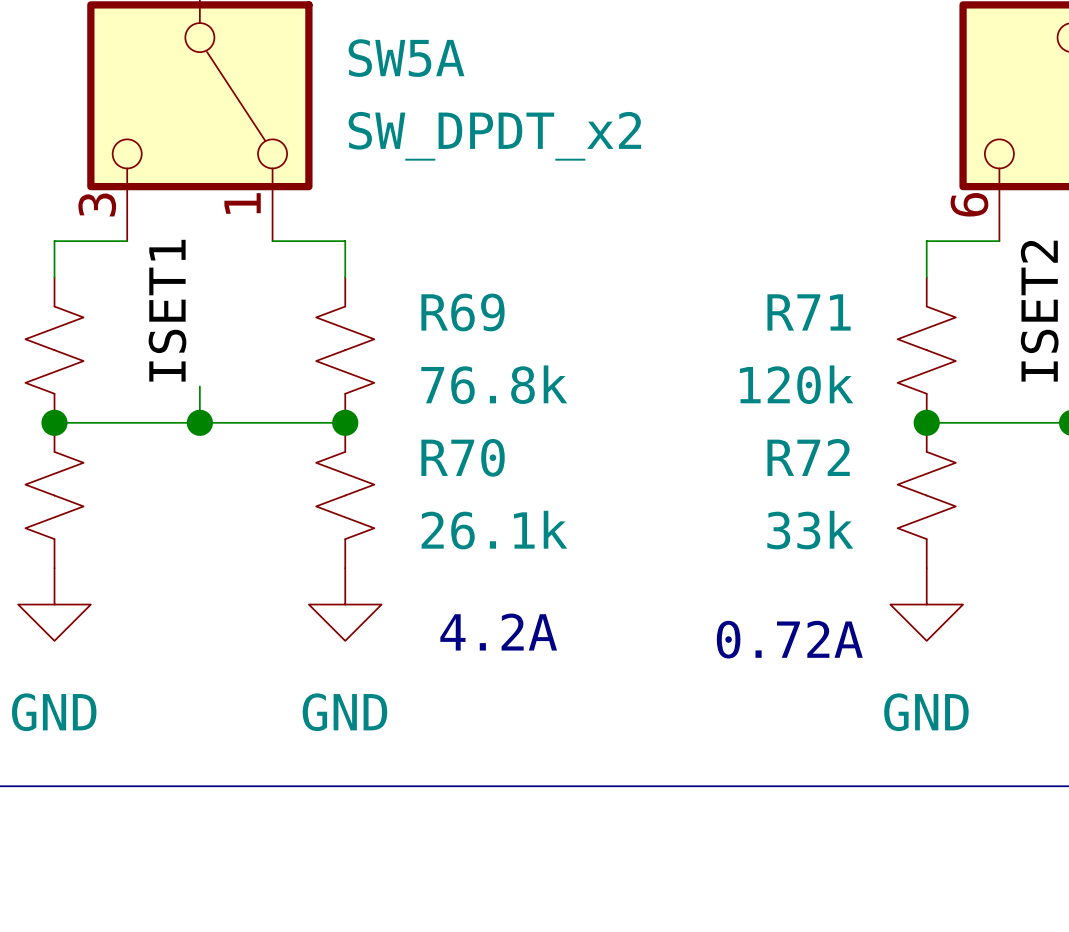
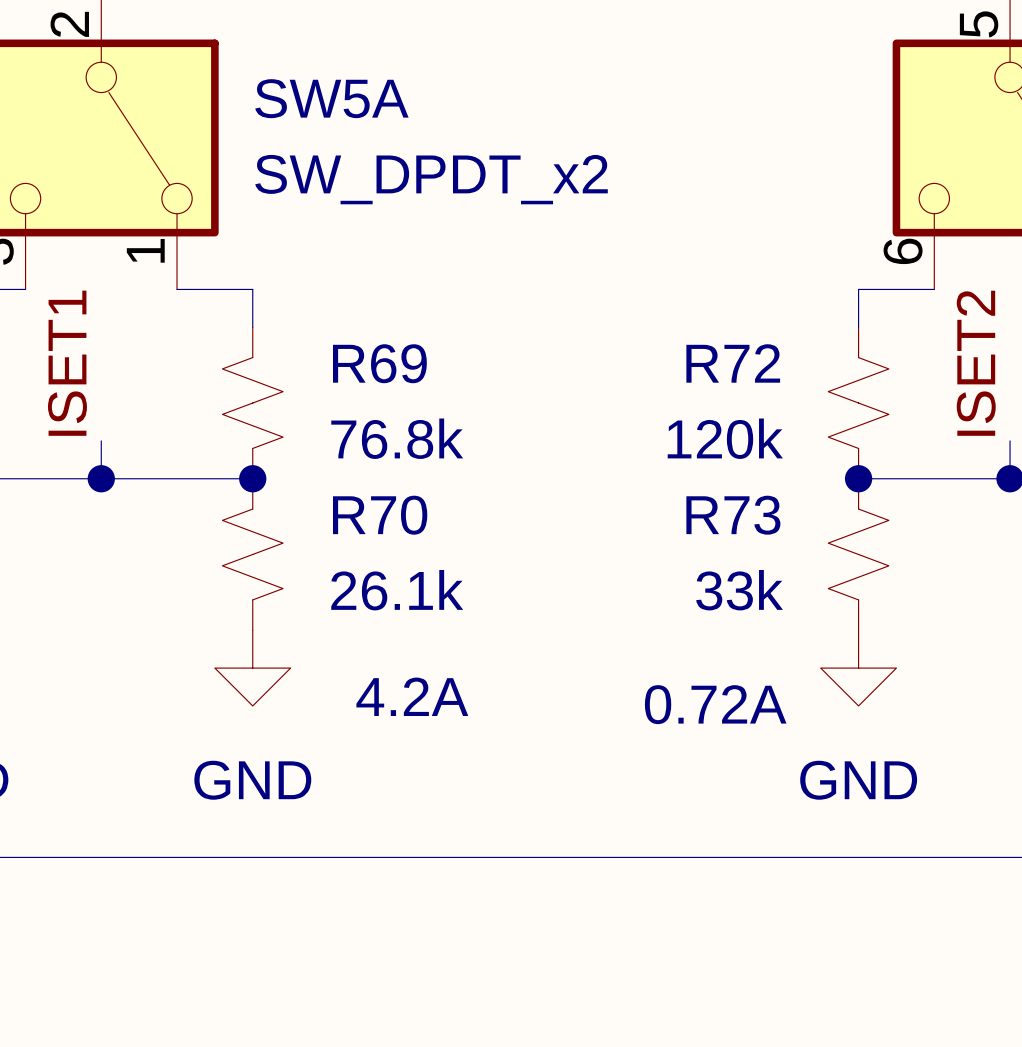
R71 name: R71 (809, 312) -> R72 (733, 363)
R72 name: R72 (808, 457) -> R73 (733, 515)

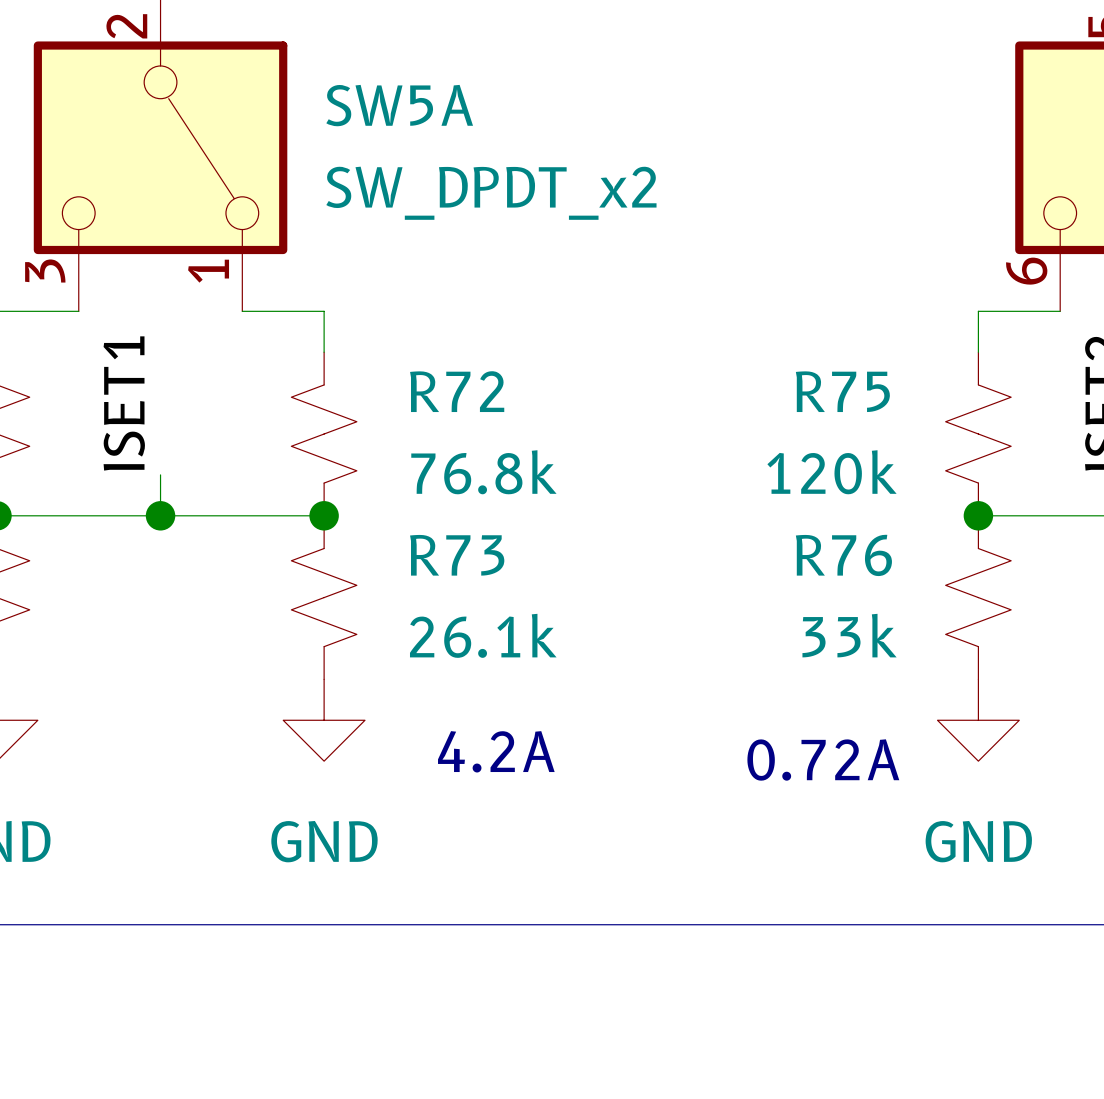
R69 name: R69 (379, 363) -> R72 (457, 391)
R72 name: R72 (733, 363) -> R75 (842, 391)
R70 name: R70 (380, 515) -> R73 (457, 555)
R73 name: R73 (733, 515) -> R76 (843, 555)

